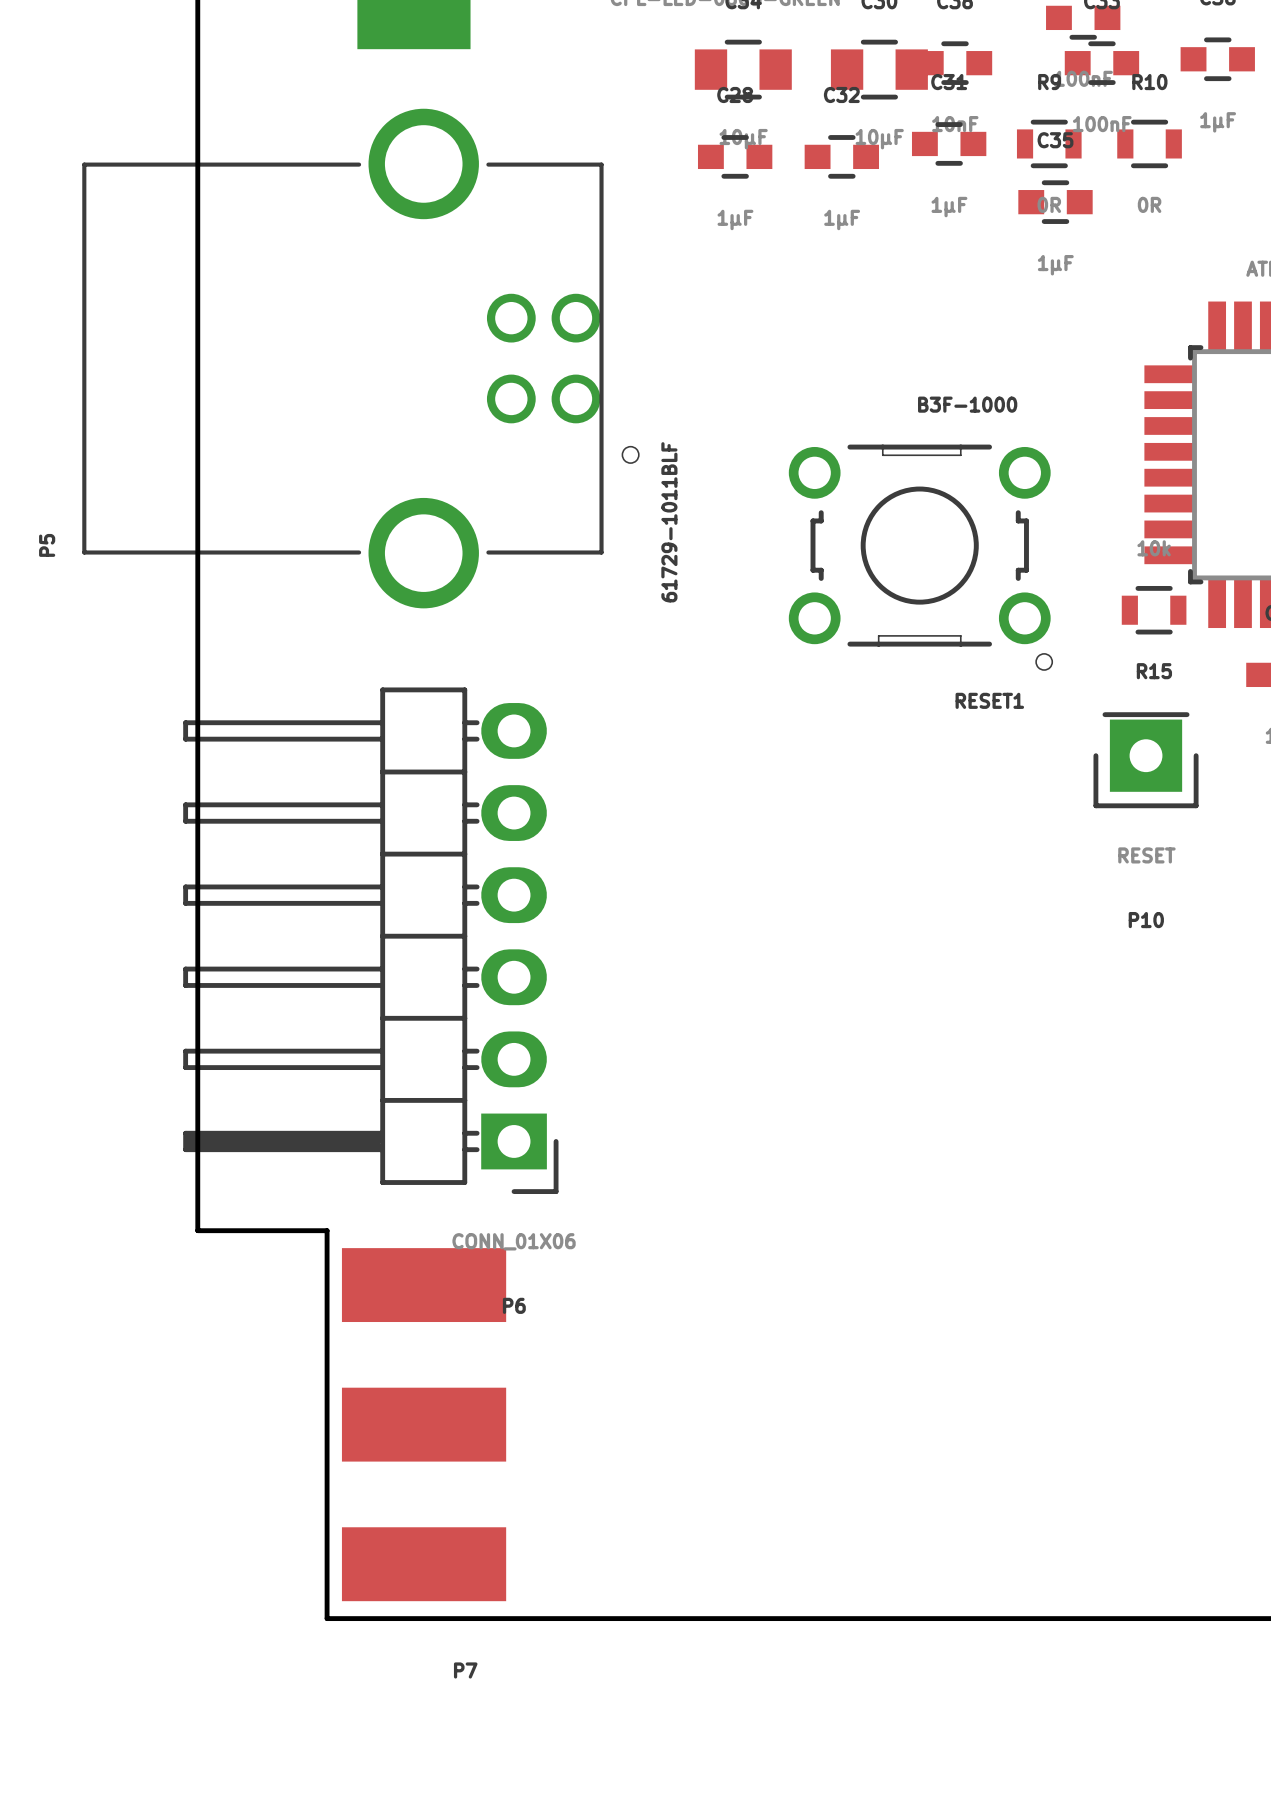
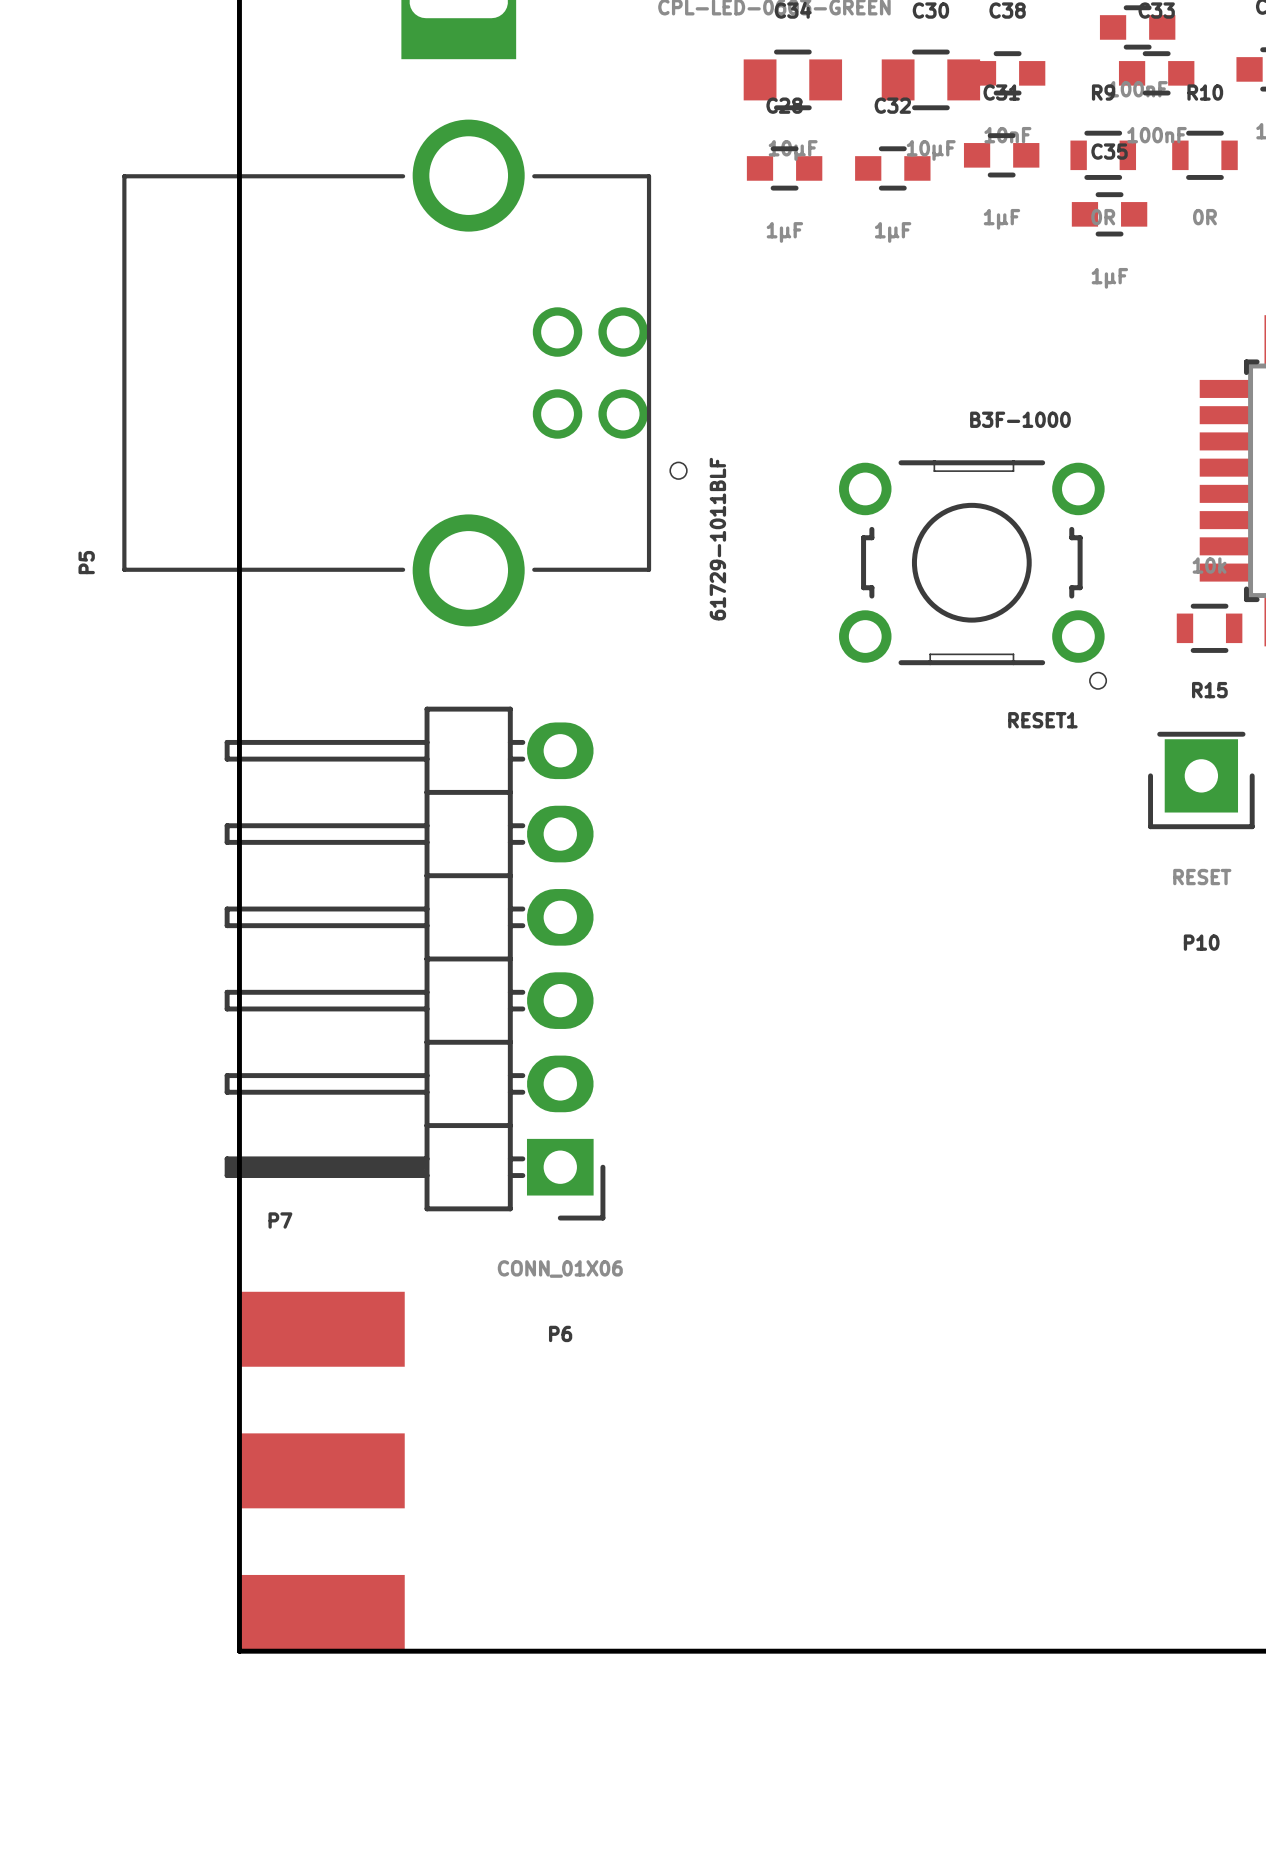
board edge: (197, 1230) (327, 1230) (327, 1618) -> (239, 1257) (239, 1651) (370, 1651)
P7 position: (424, 1424) -> (321, 1470)
P7 name position: P7 (465, 1670) -> P7 (280, 1220)

